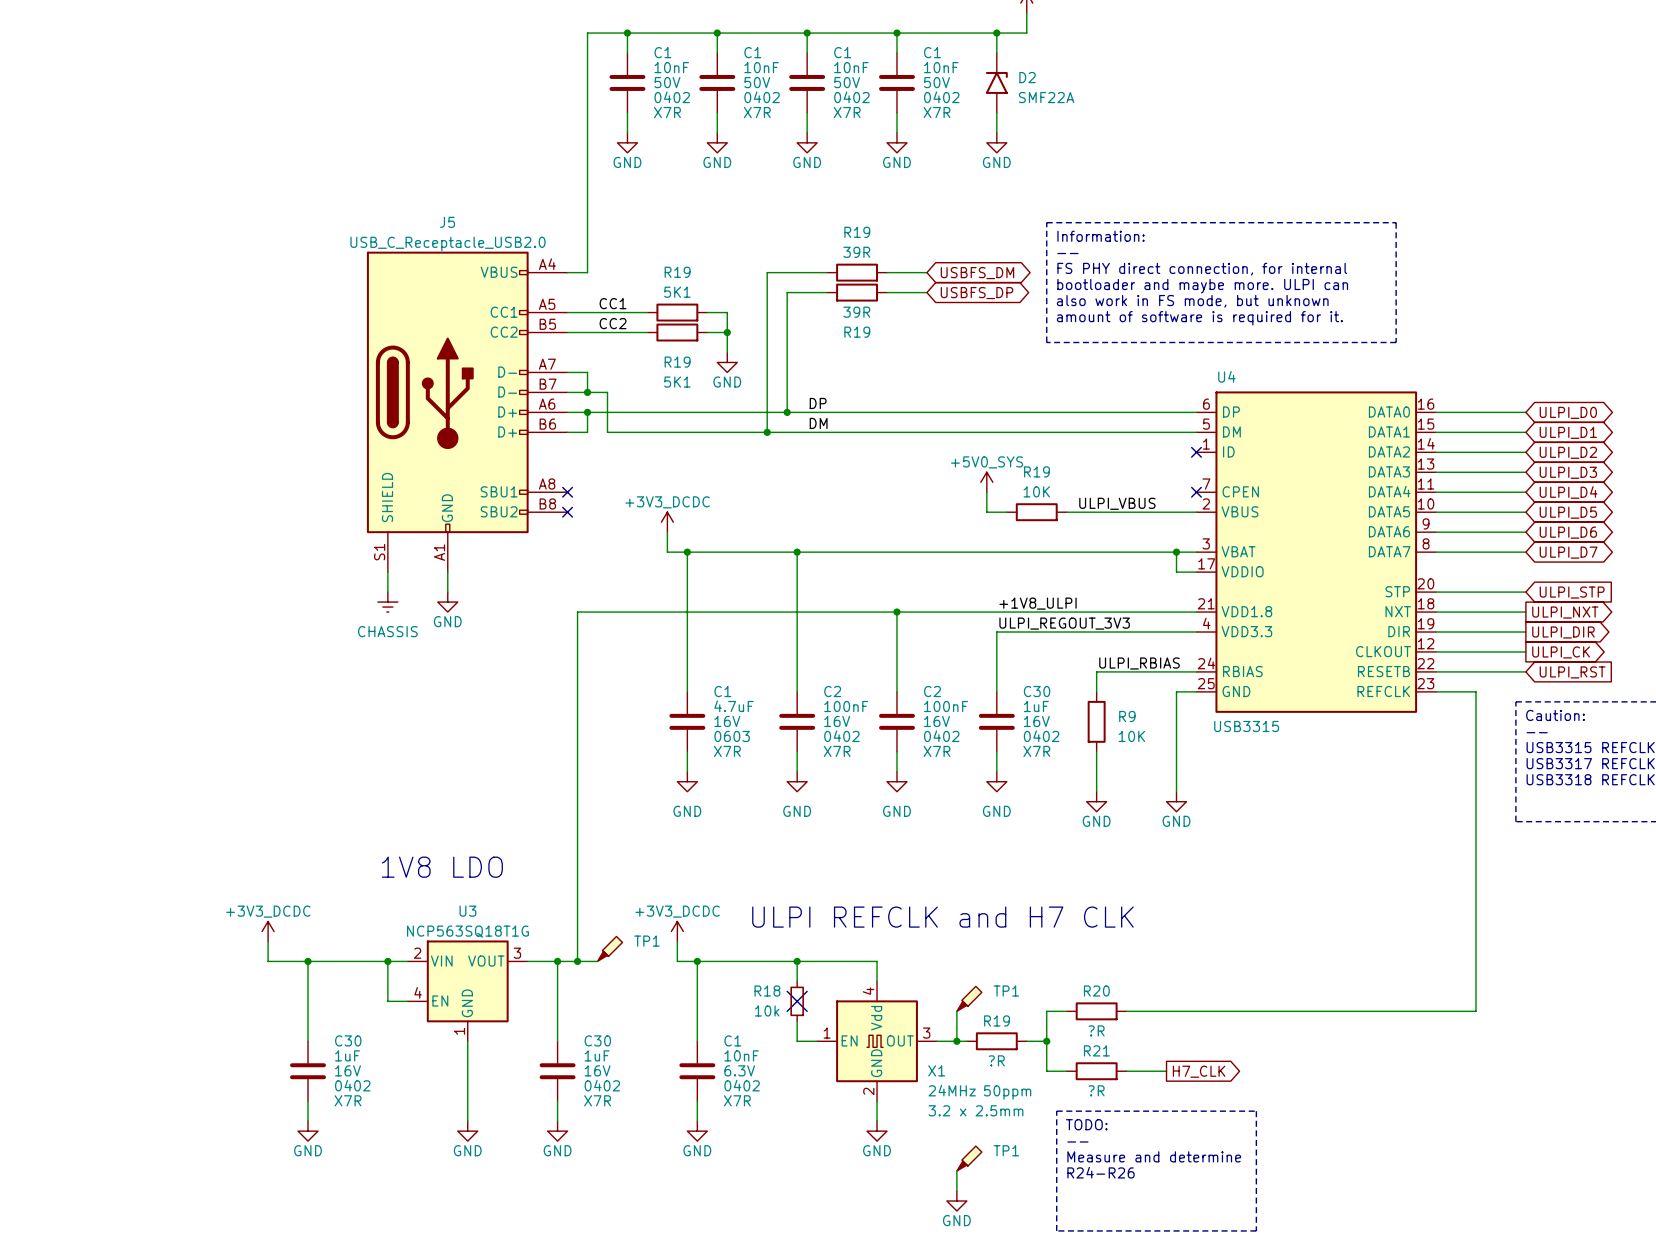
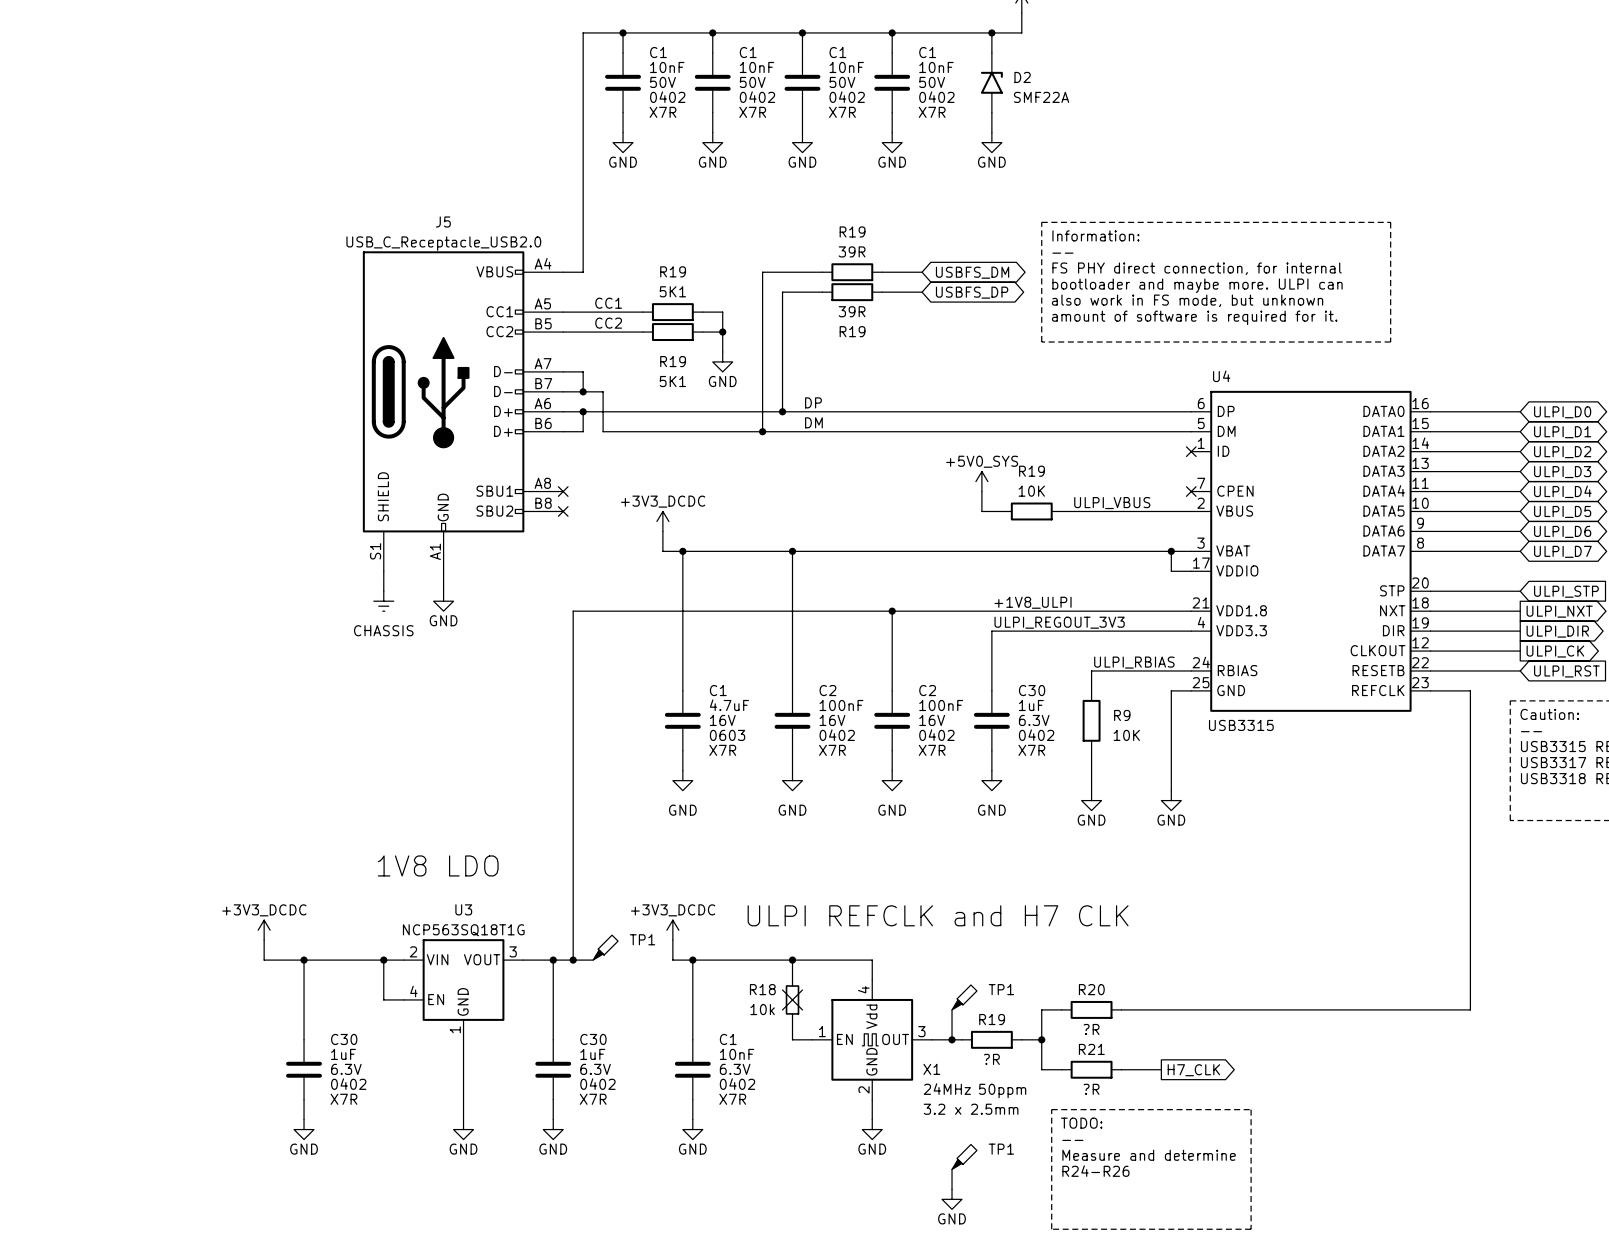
C30 text: 16V (1036, 721) -> 6.3V (1034, 720)
C30 text: 16V (348, 1070) -> 6.3V (346, 1069)
C30 text: 16V (597, 1070) -> 6.3V (595, 1069)

